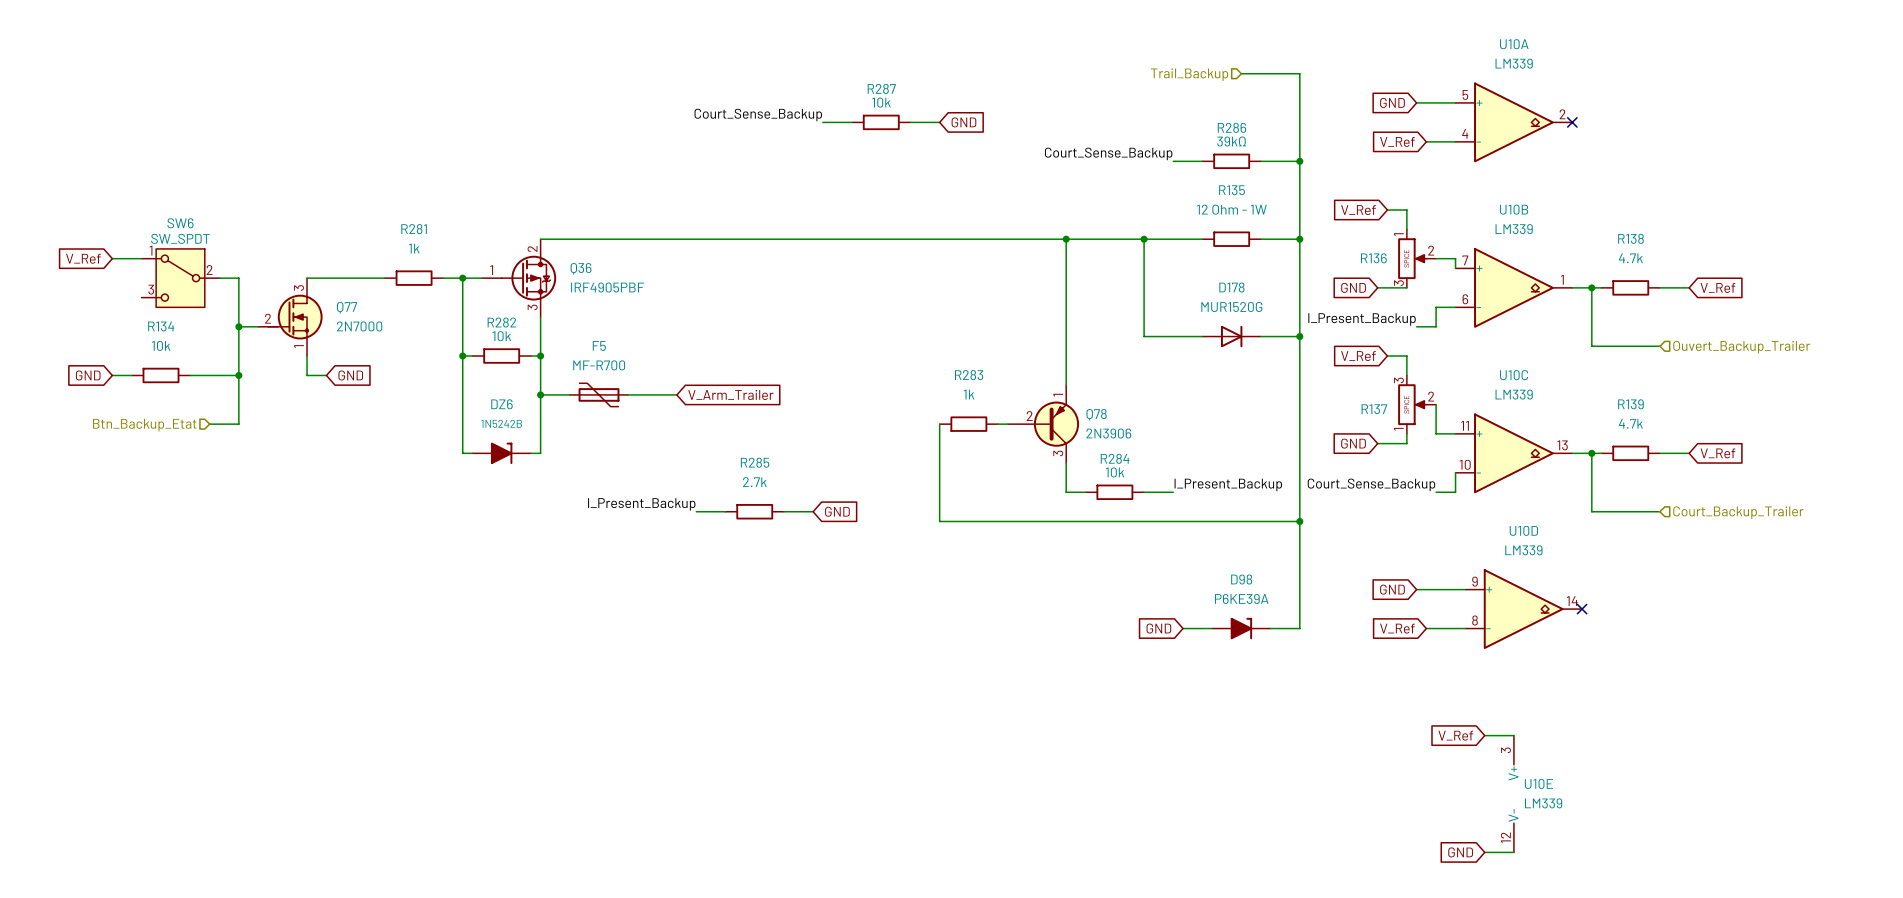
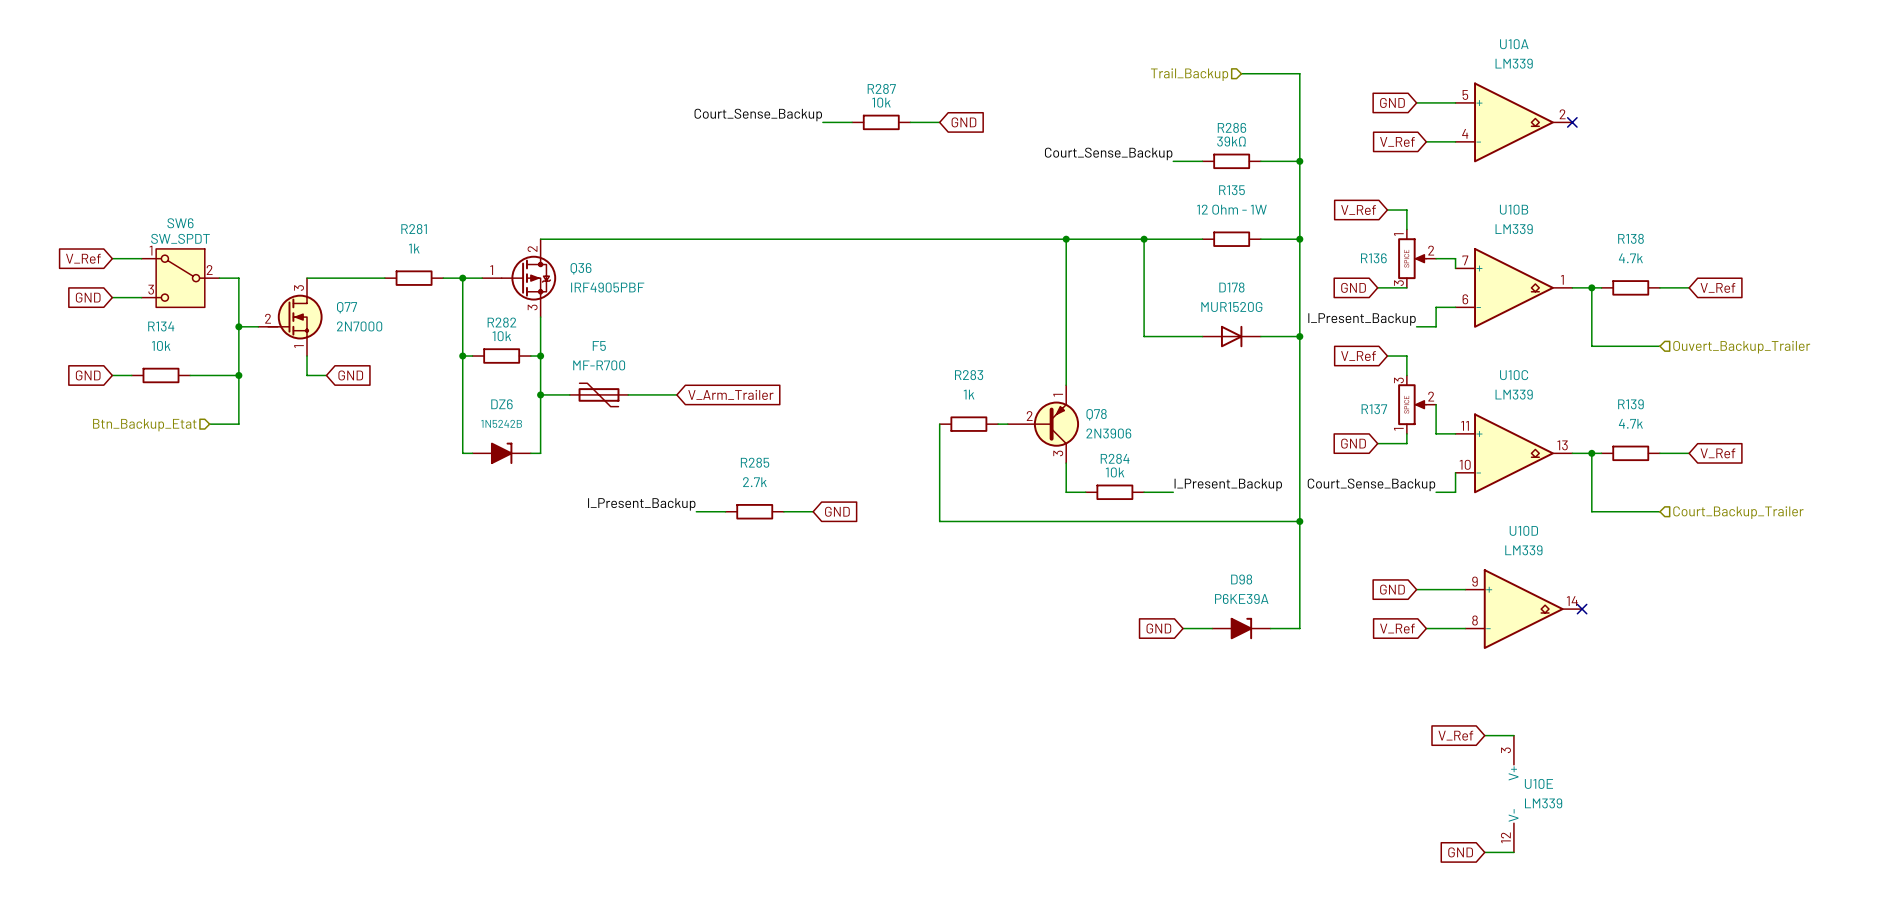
global label: none -> GND (88, 297)
wire: none -> (112, 297) (141, 297)

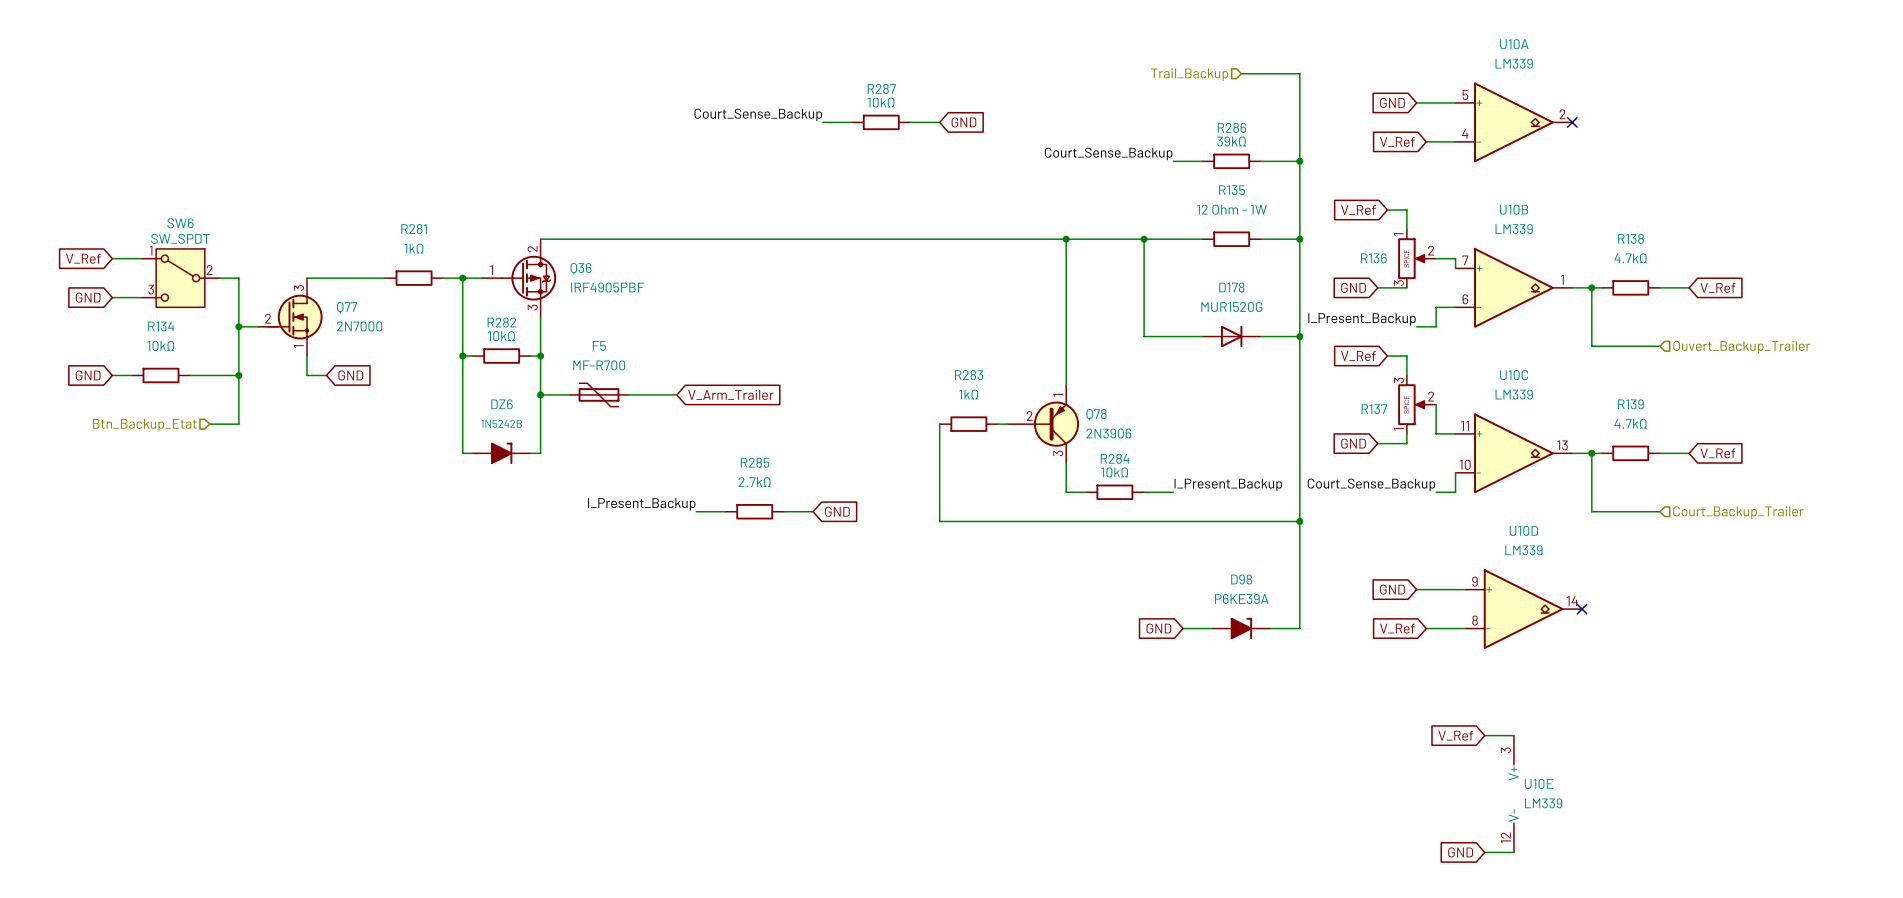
R287 value: 10k (881, 102) -> 10kΩ (881, 102)
R281 value: 1k (414, 248) -> 1kΩ (413, 248)
R138 value: 4.7k (1630, 258) -> 4.7kΩ (1630, 258)
R282 value: 10k (501, 336) -> 10kΩ (501, 336)
R134 value: 10k (161, 345) -> 10kΩ (160, 345)
R283 value: 1k (969, 394) -> 1kΩ (968, 394)
R139 value: 4.7k (1630, 423) -> 4.7kΩ (1630, 423)
R284 value: 10k (1115, 472) -> 10kΩ (1114, 472)
R285 value: 2.7k (754, 482) -> 2.7kΩ (754, 482)

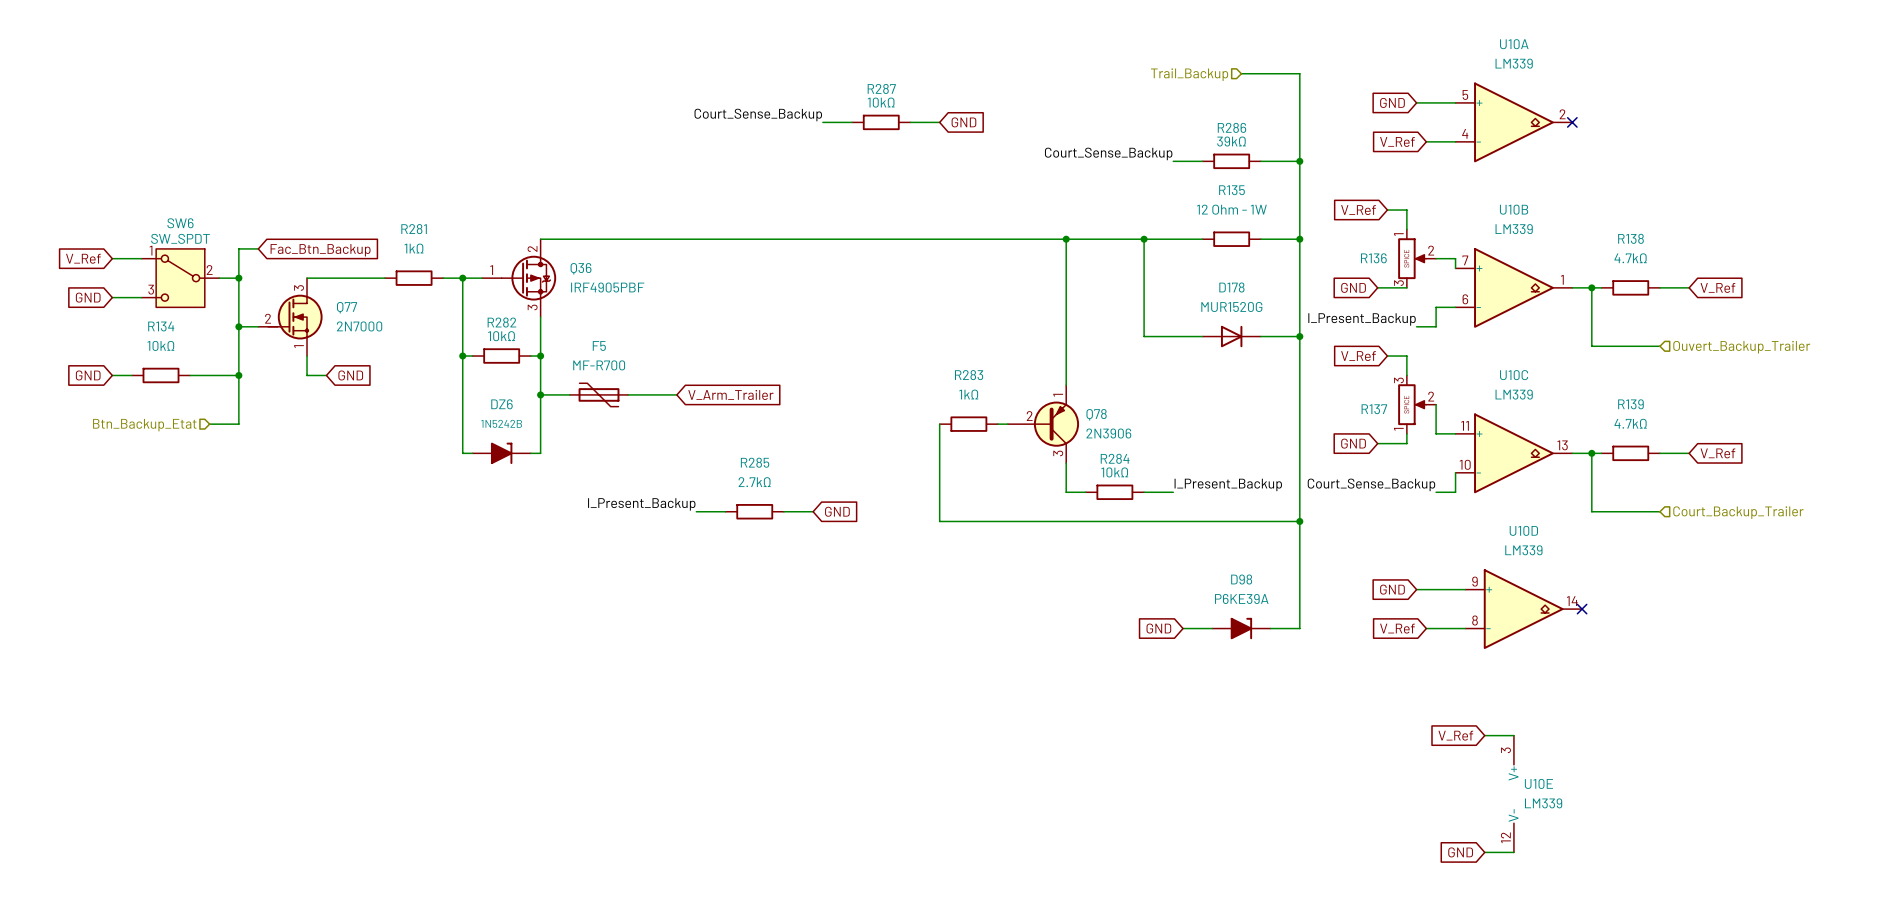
wire: none -> (258, 248) (238, 248) (238, 278)
global label: none -> Fac_Btn_Backup (320, 250)
junction: none -> (238, 278)

